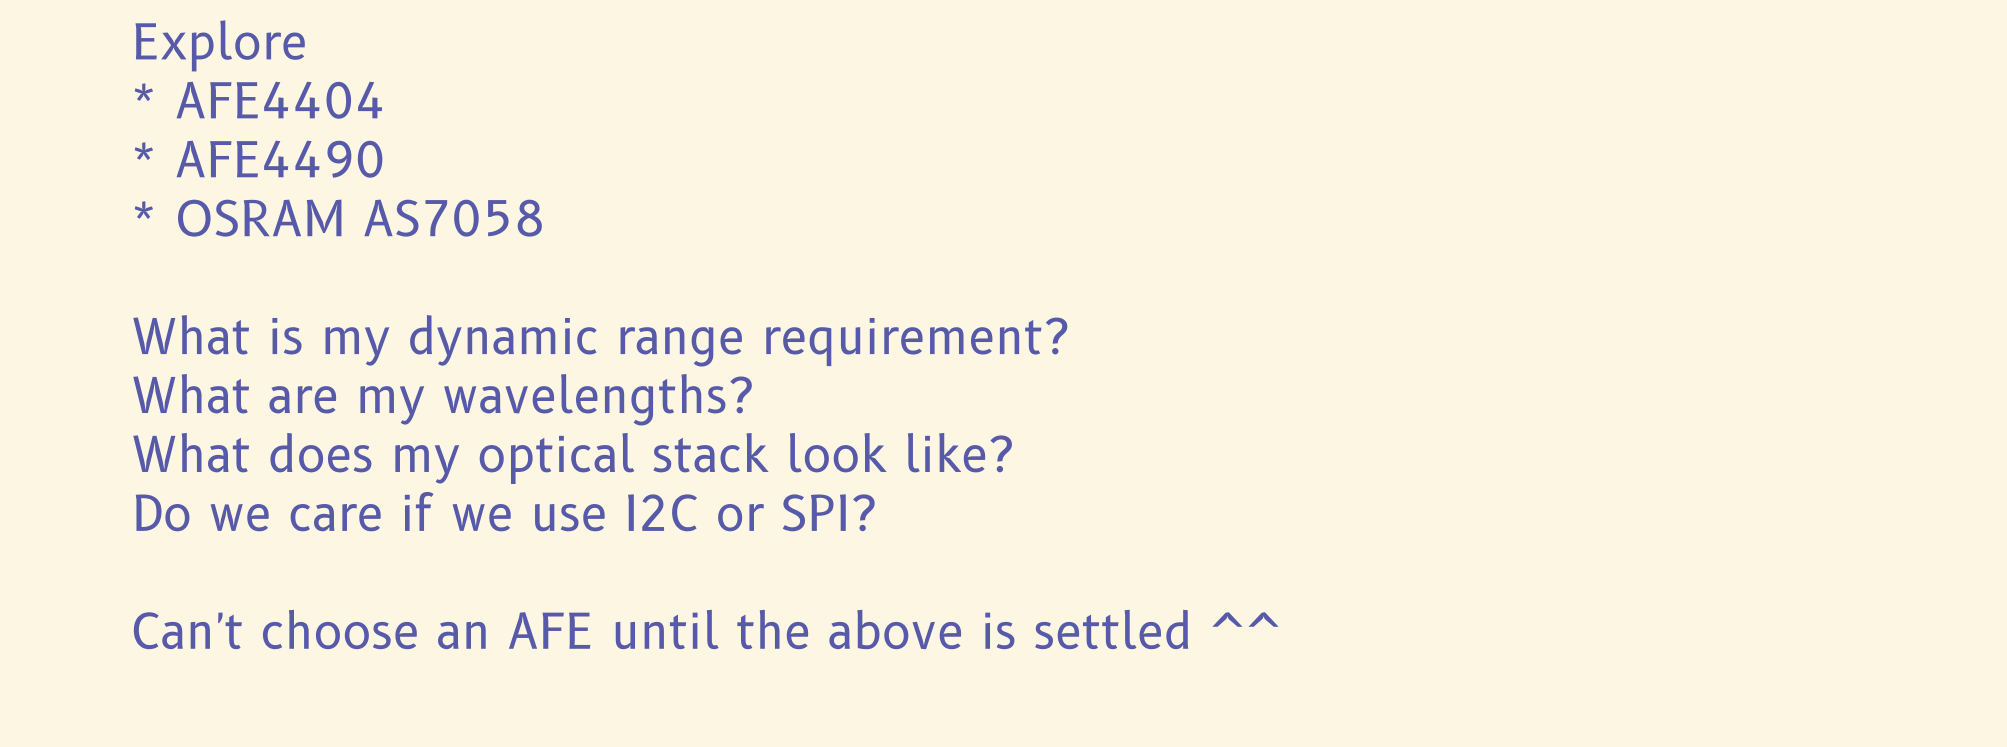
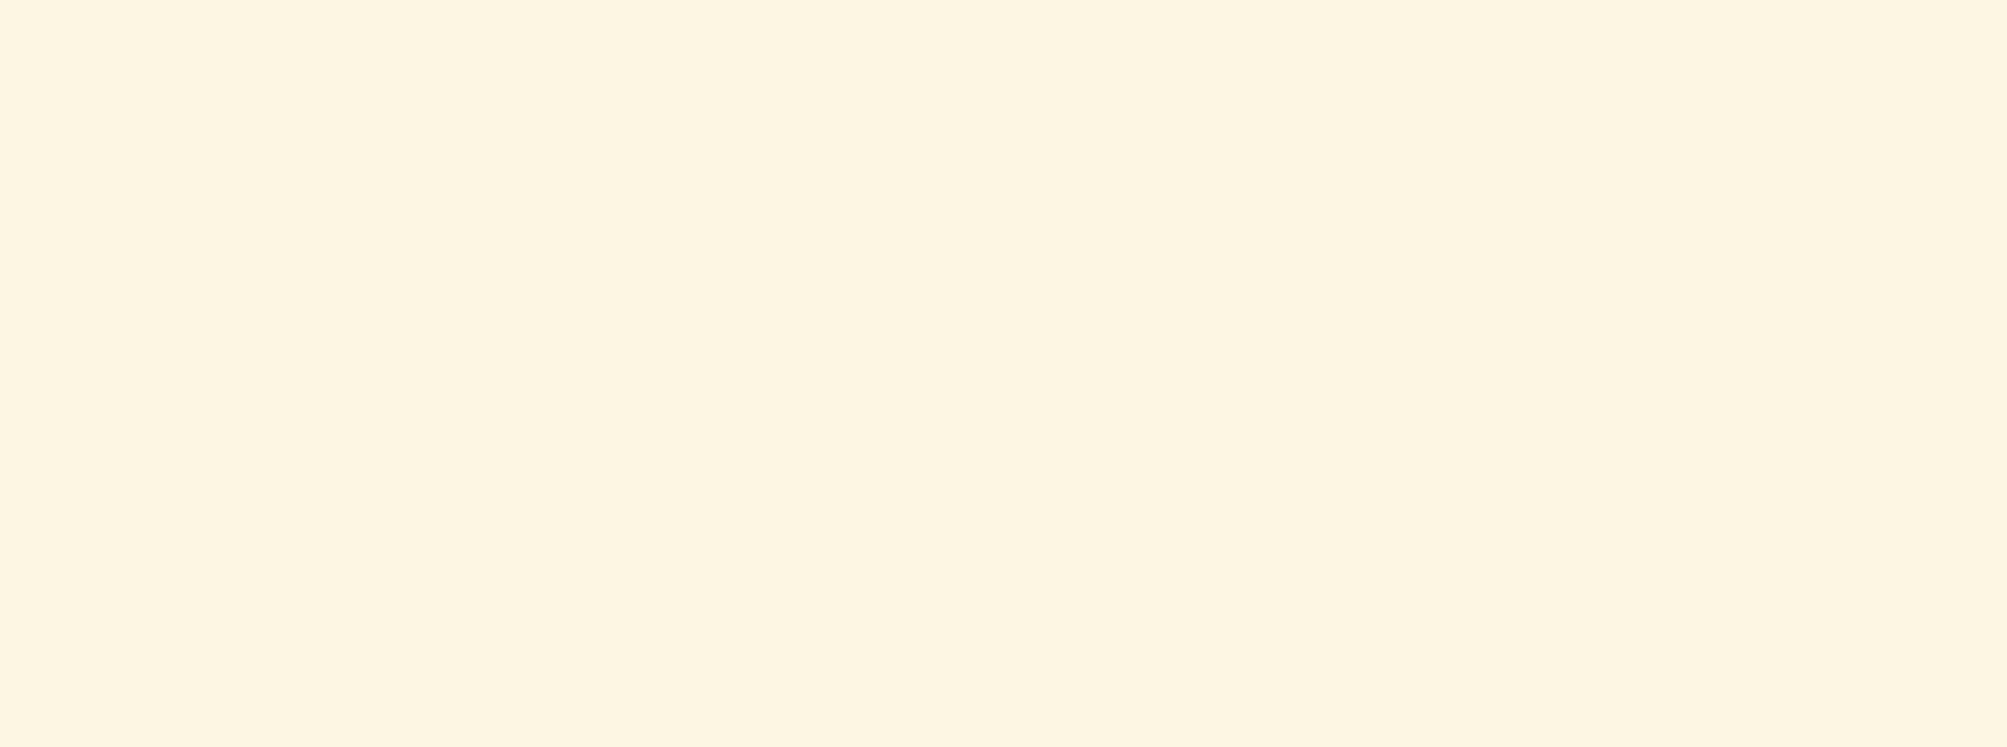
text: Explore (220, 45) -> none
text: * AFE4404 (258, 100) -> none
text: * AFE4490 (258, 159) -> none
text: * OSRAM AS7058 (338, 218) -> none
text: What is my dynamic range requirement? (600, 340) -> none
text: What are my wavelengths? (442, 399) -> none
text: What does my optical stack look like? (572, 458) -> none
text: Do we care if we use I2C or SPI? (505, 511) -> none
text: Can't choose an AFE until the above is settled ^^ (706, 629) -> none

